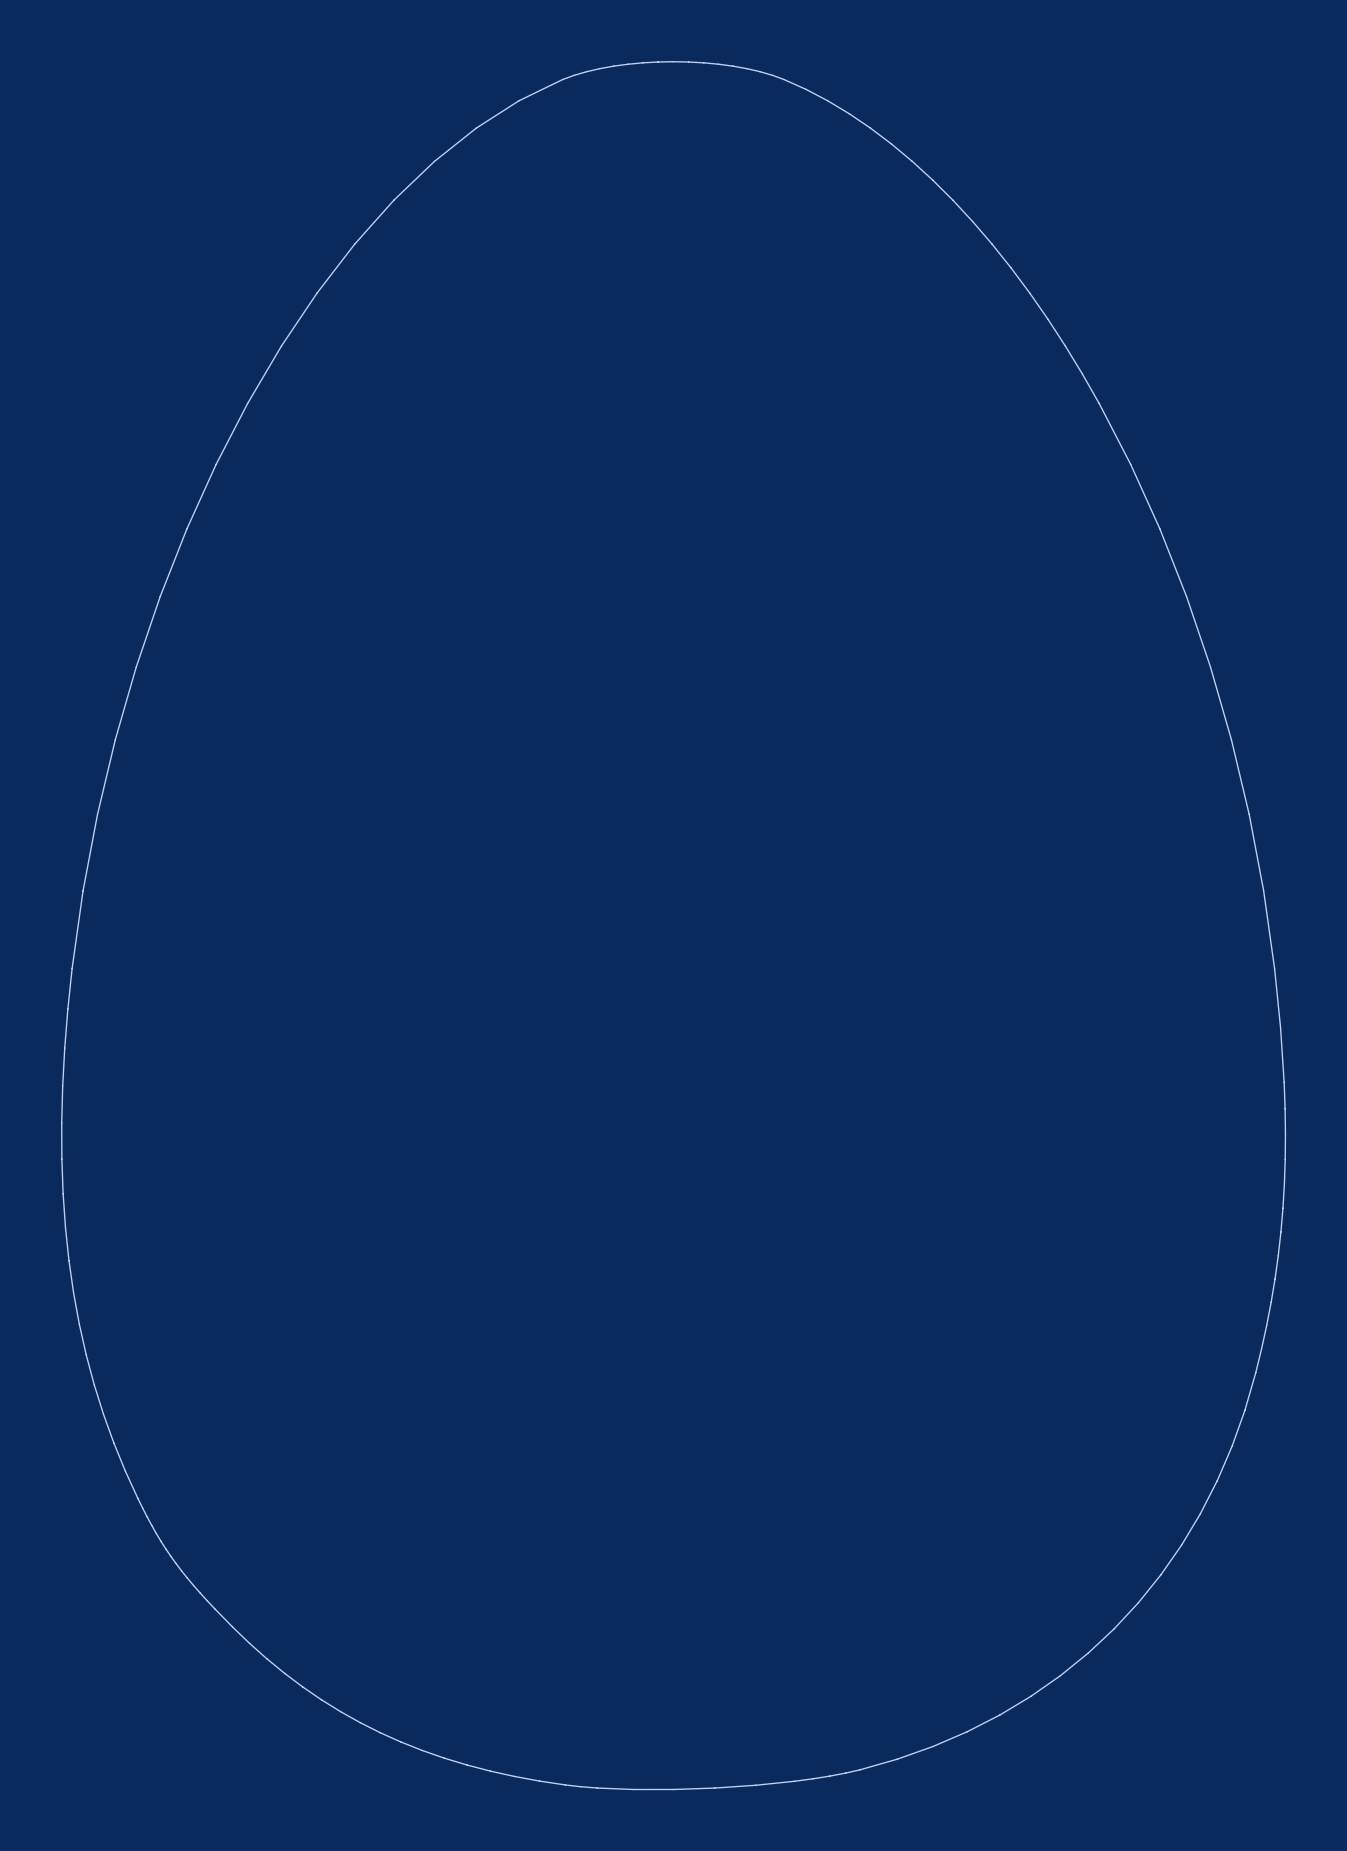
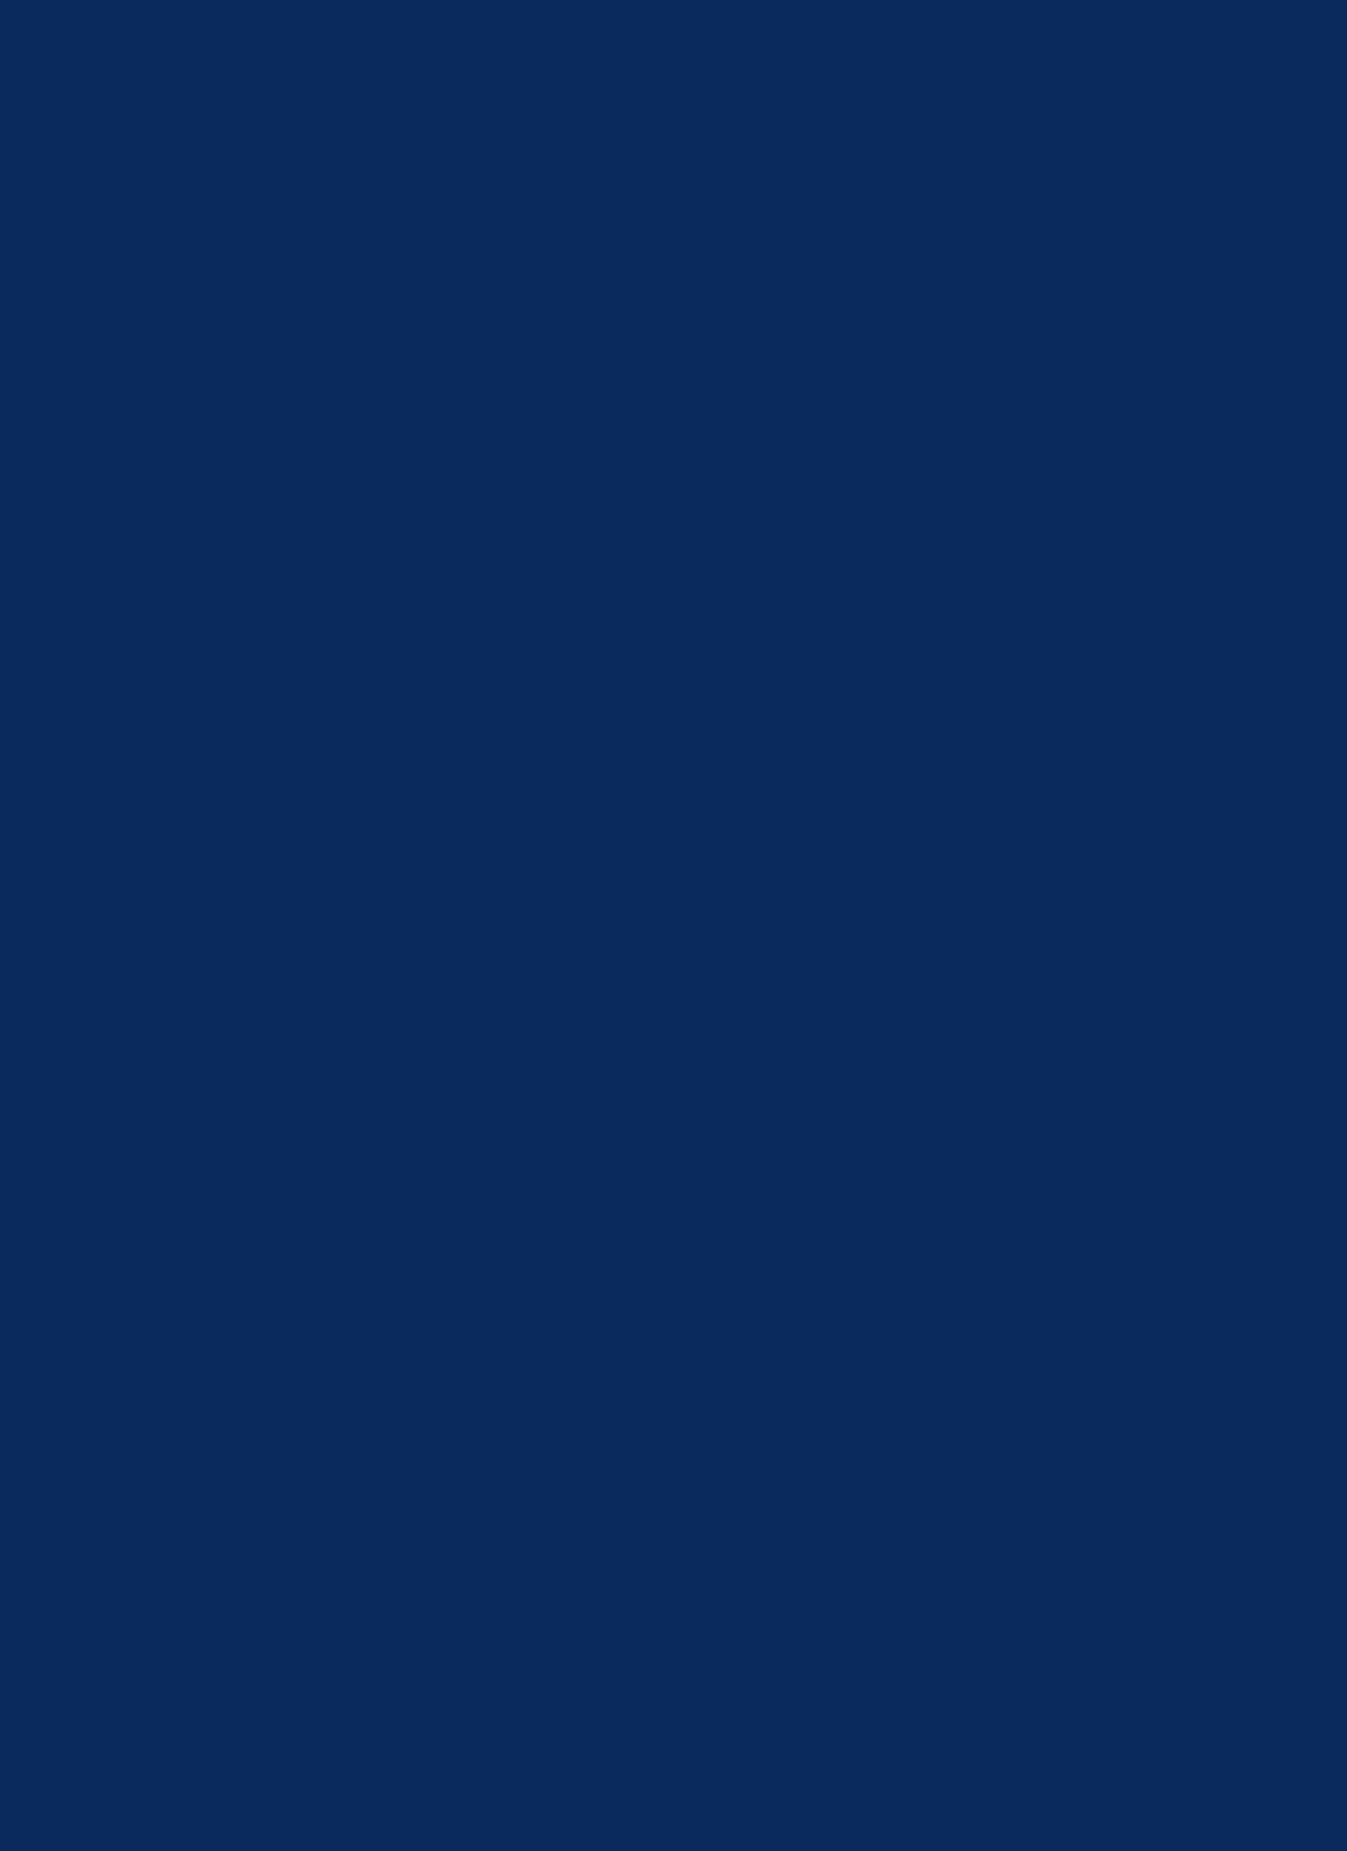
board edge: (673, 61) (733, 66) (783, 79) (827, 100) (891, 144) (932, 180) (992, 244) (1047, 318) (1099, 403) (1130, 464) (1159, 528) (1186, 596) (1210, 666) (1231, 739) (1249, 814) (1263, 890) (1274, 968) (1284, 1082) (1285, 1159) (1280, 1232) (1271, 1302) (1255, 1372) (1232, 1446) (1217, 1480) (1181, 1545) (1160, 1574) (1114, 1628) (1060, 1675) (999, 1715) (932, 1746) (897, 1759) (845, 1773) (794, 1781) (714, 1788) (633, 1789) (565, 1784) (490, 1771) (422, 1750) (380, 1732) (340, 1711) (284, 1673) (232, 1626) (193, 1585) (165, 1548) (142, 1508) (113, 1442) (94, 1384) (79, 1324) (68, 1260) (63, 1193) (61, 1123) (64, 1048) (72, 968) (83, 890) (97, 814) (115, 739) (136, 667) (160, 596) (186, 529) (216, 464) (247, 403) (281, 346) (317, 292) (354, 244) (393, 200) (434, 161) (476, 128) (519, 100) (562, 79) (613, 66) (673, 61) -> none

